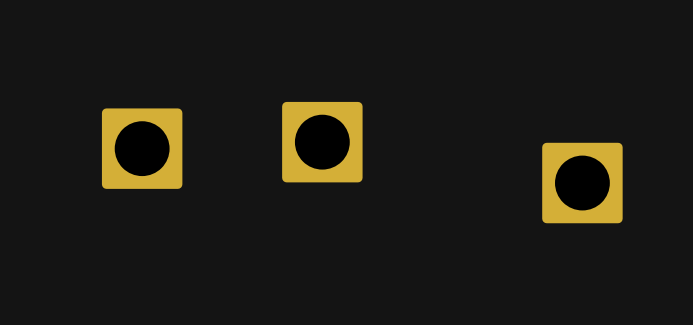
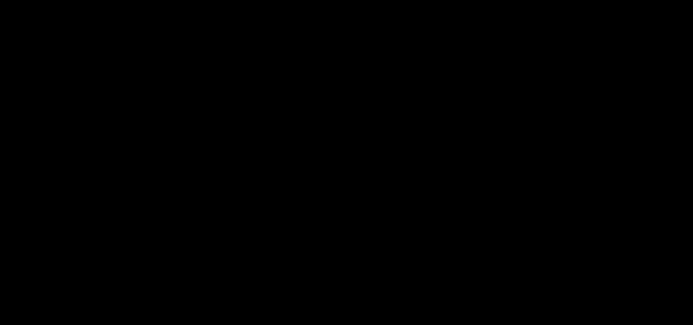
part: (322, 142) -> none
part: (142, 148) -> none
part: (582, 183) -> none

